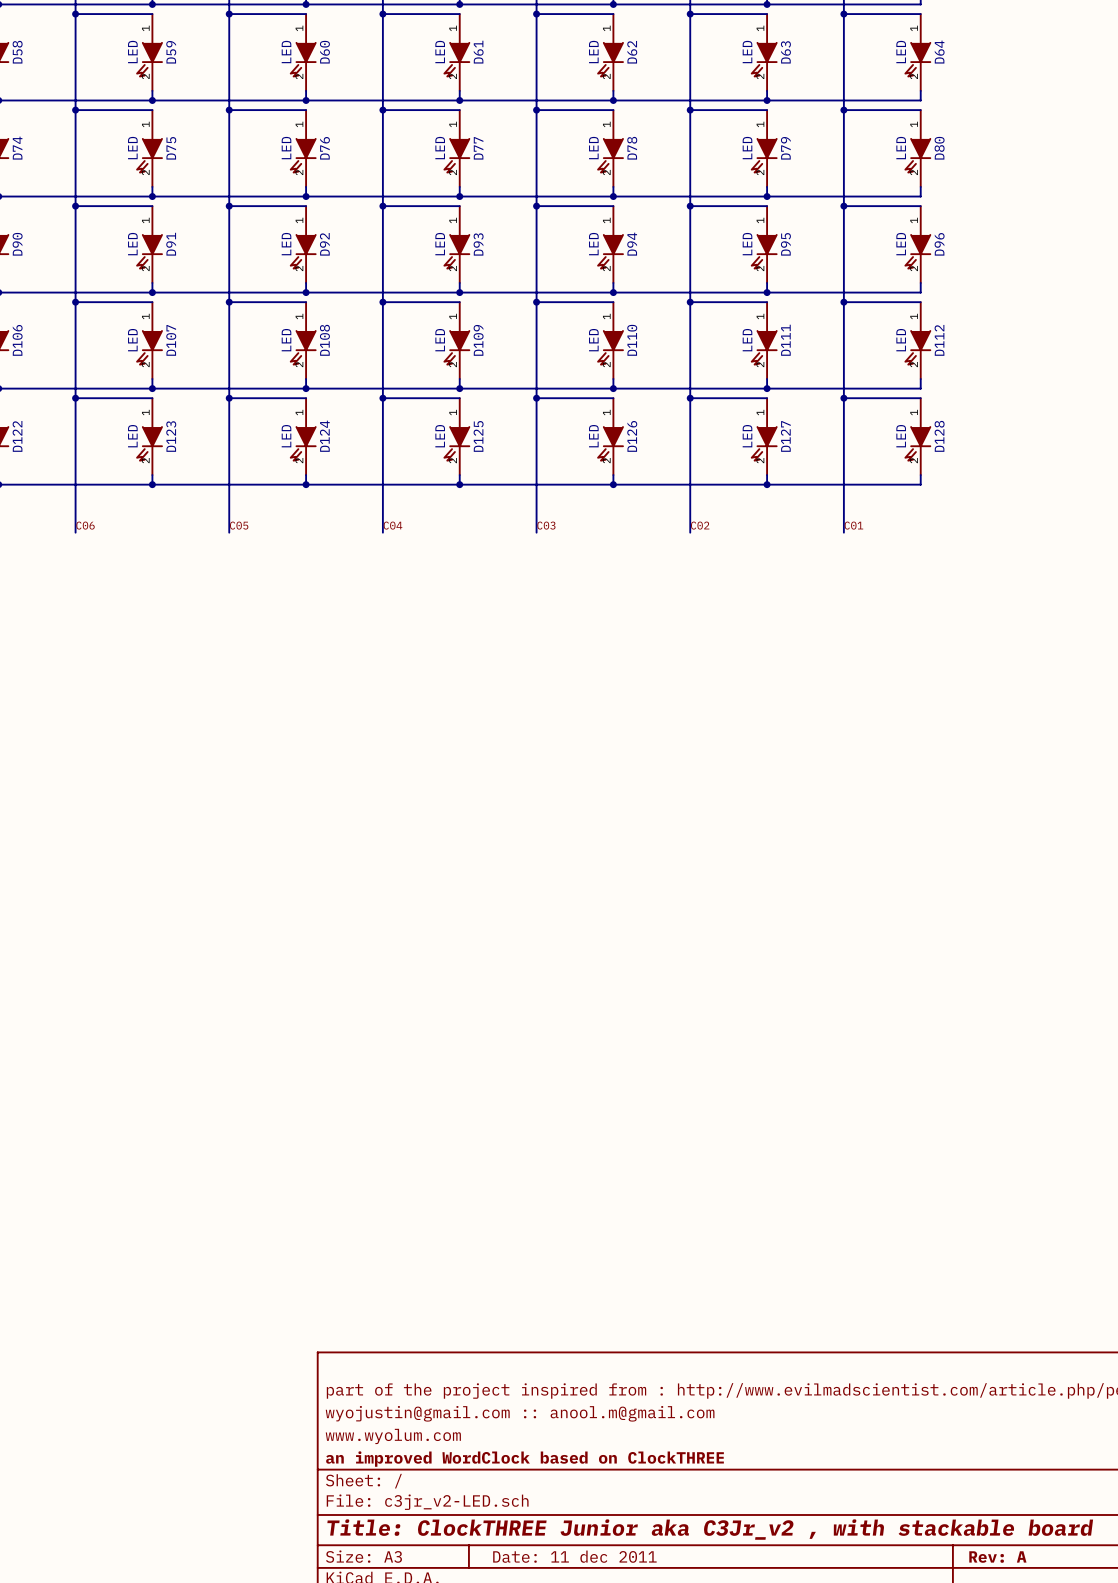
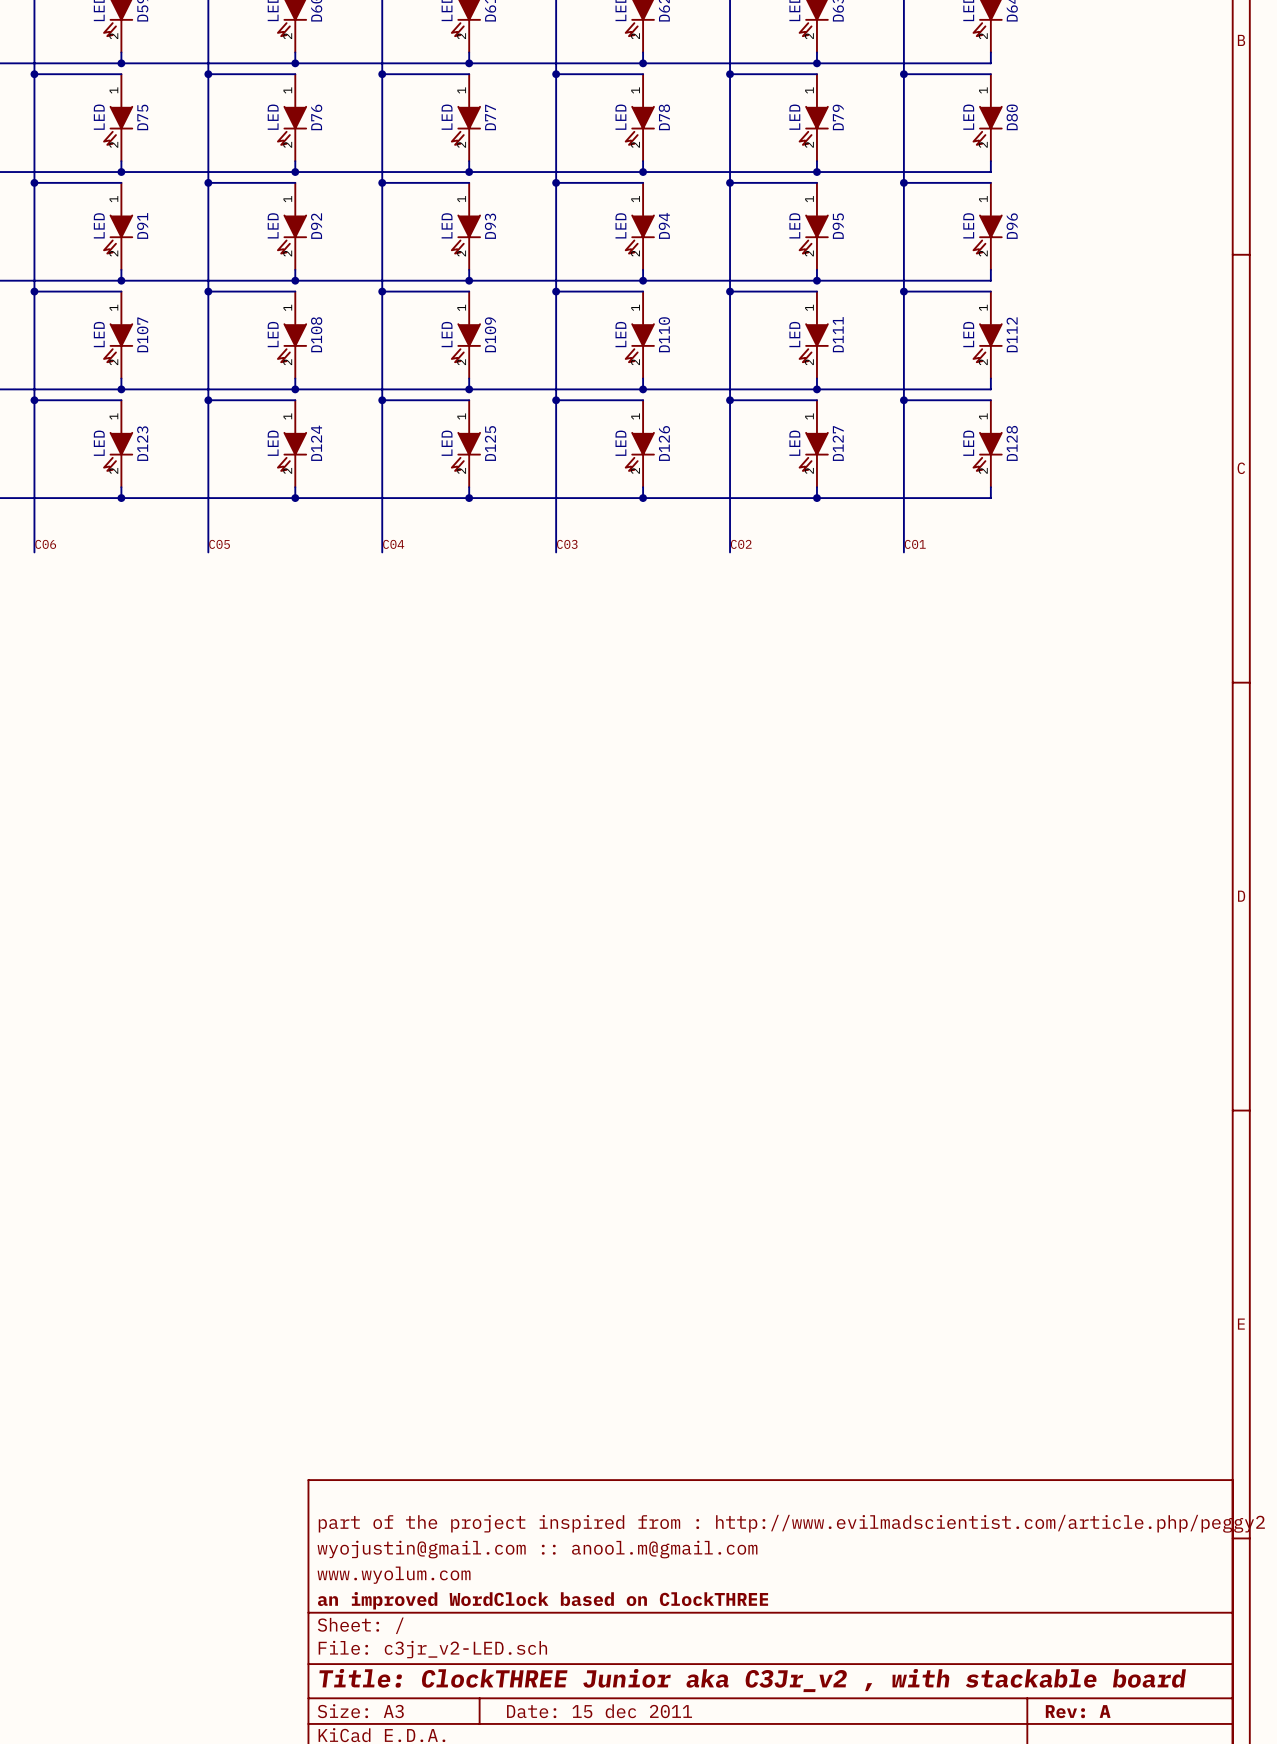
title block: Date: 11 dec 2011 (574, 1556) -> Date: 15 dec 2011 (599, 1711)

